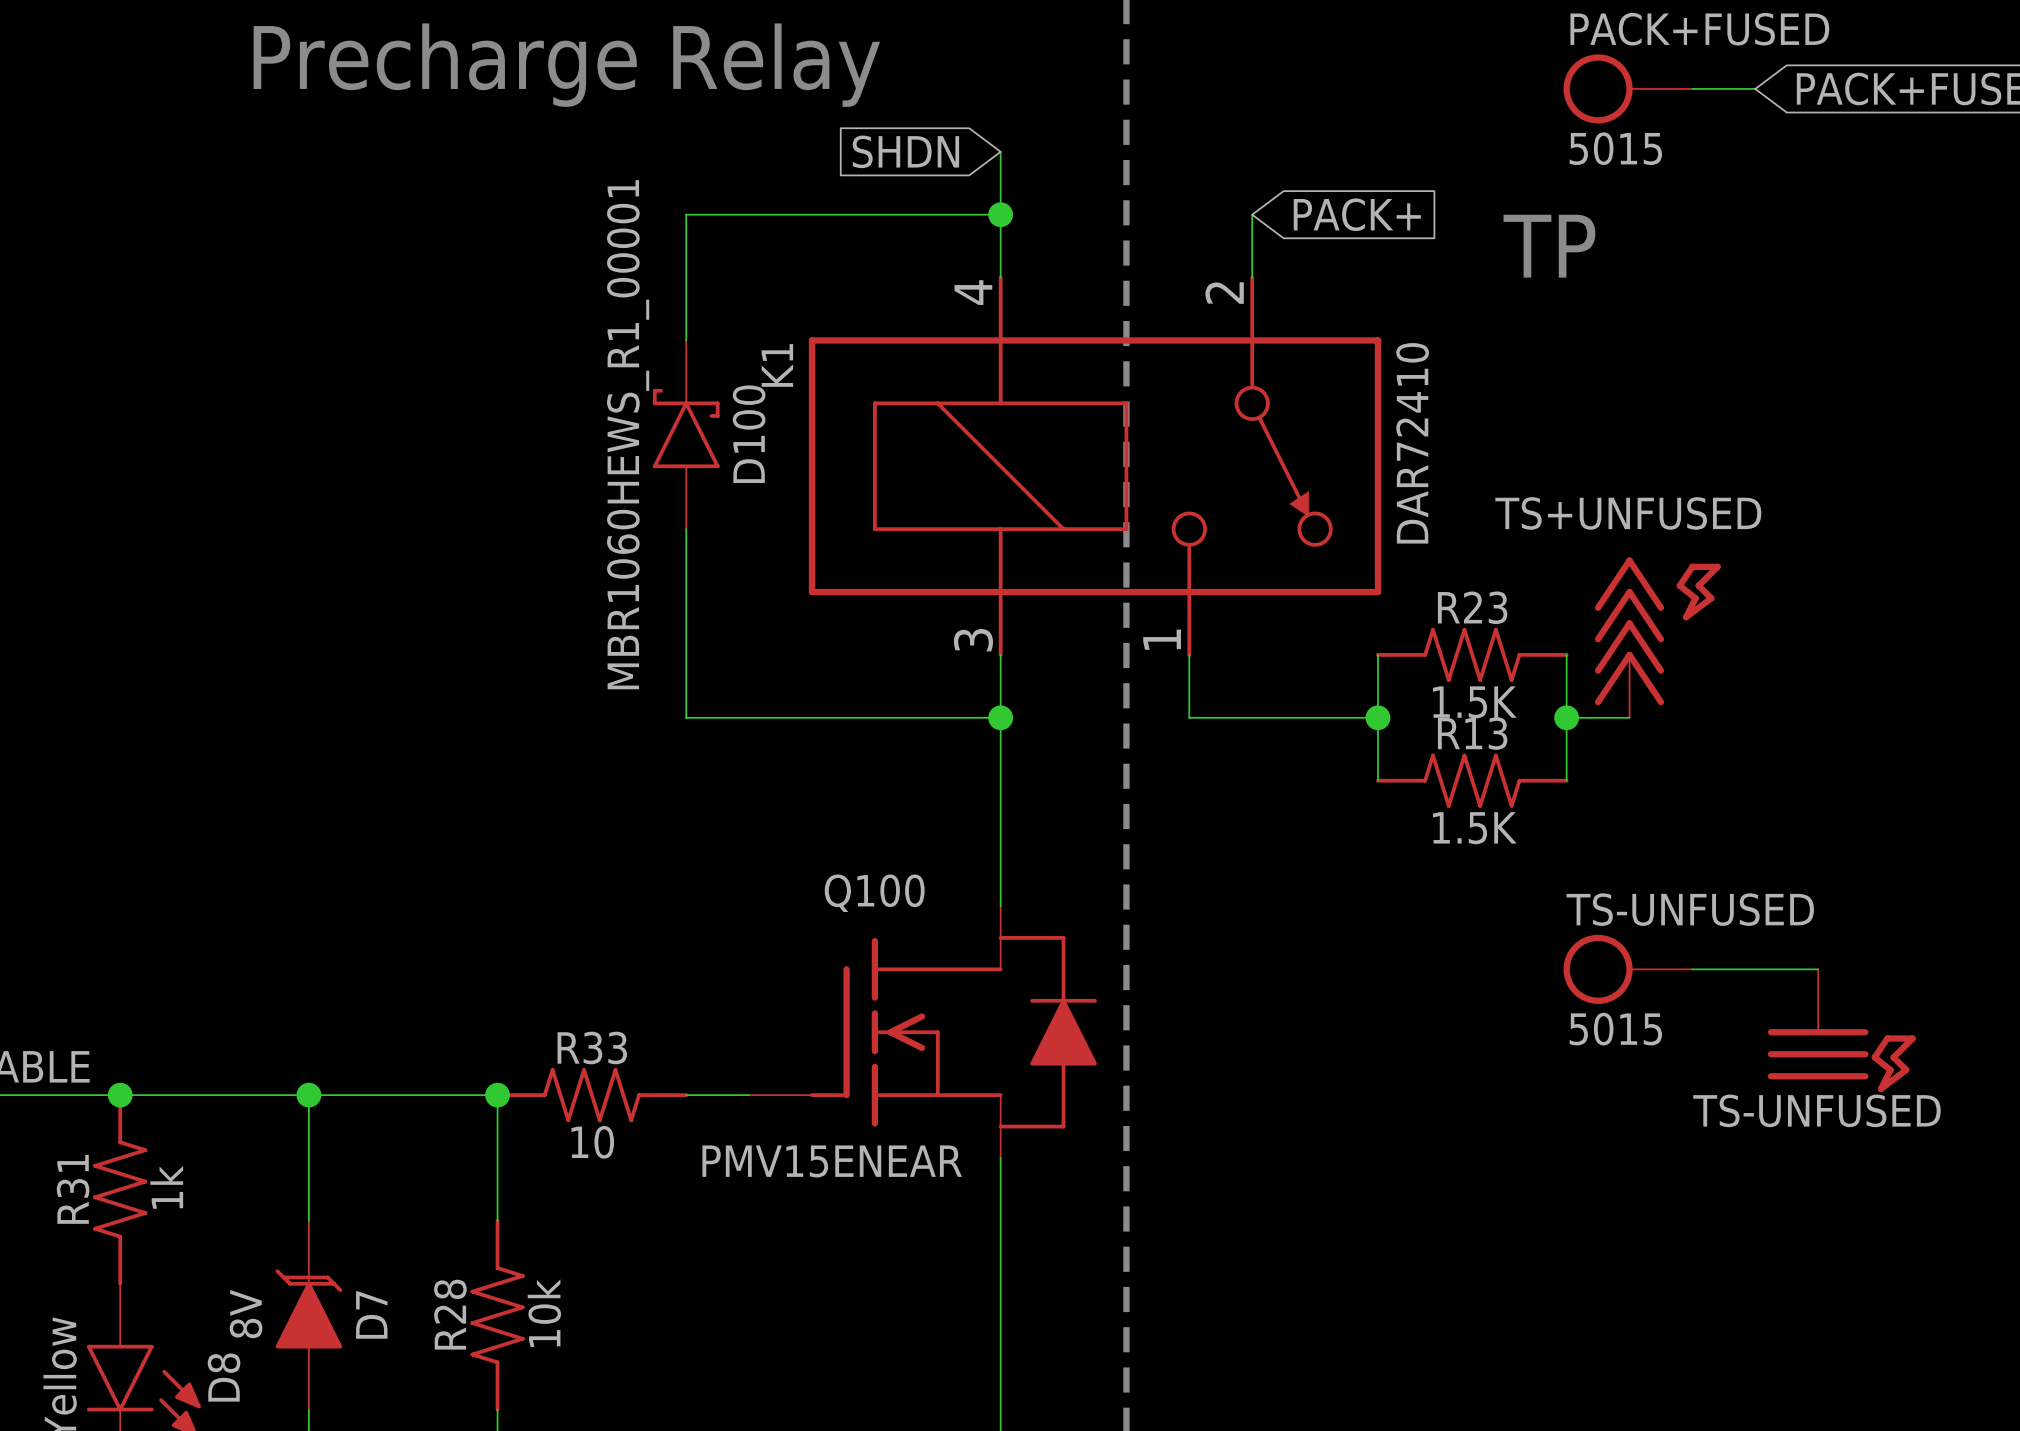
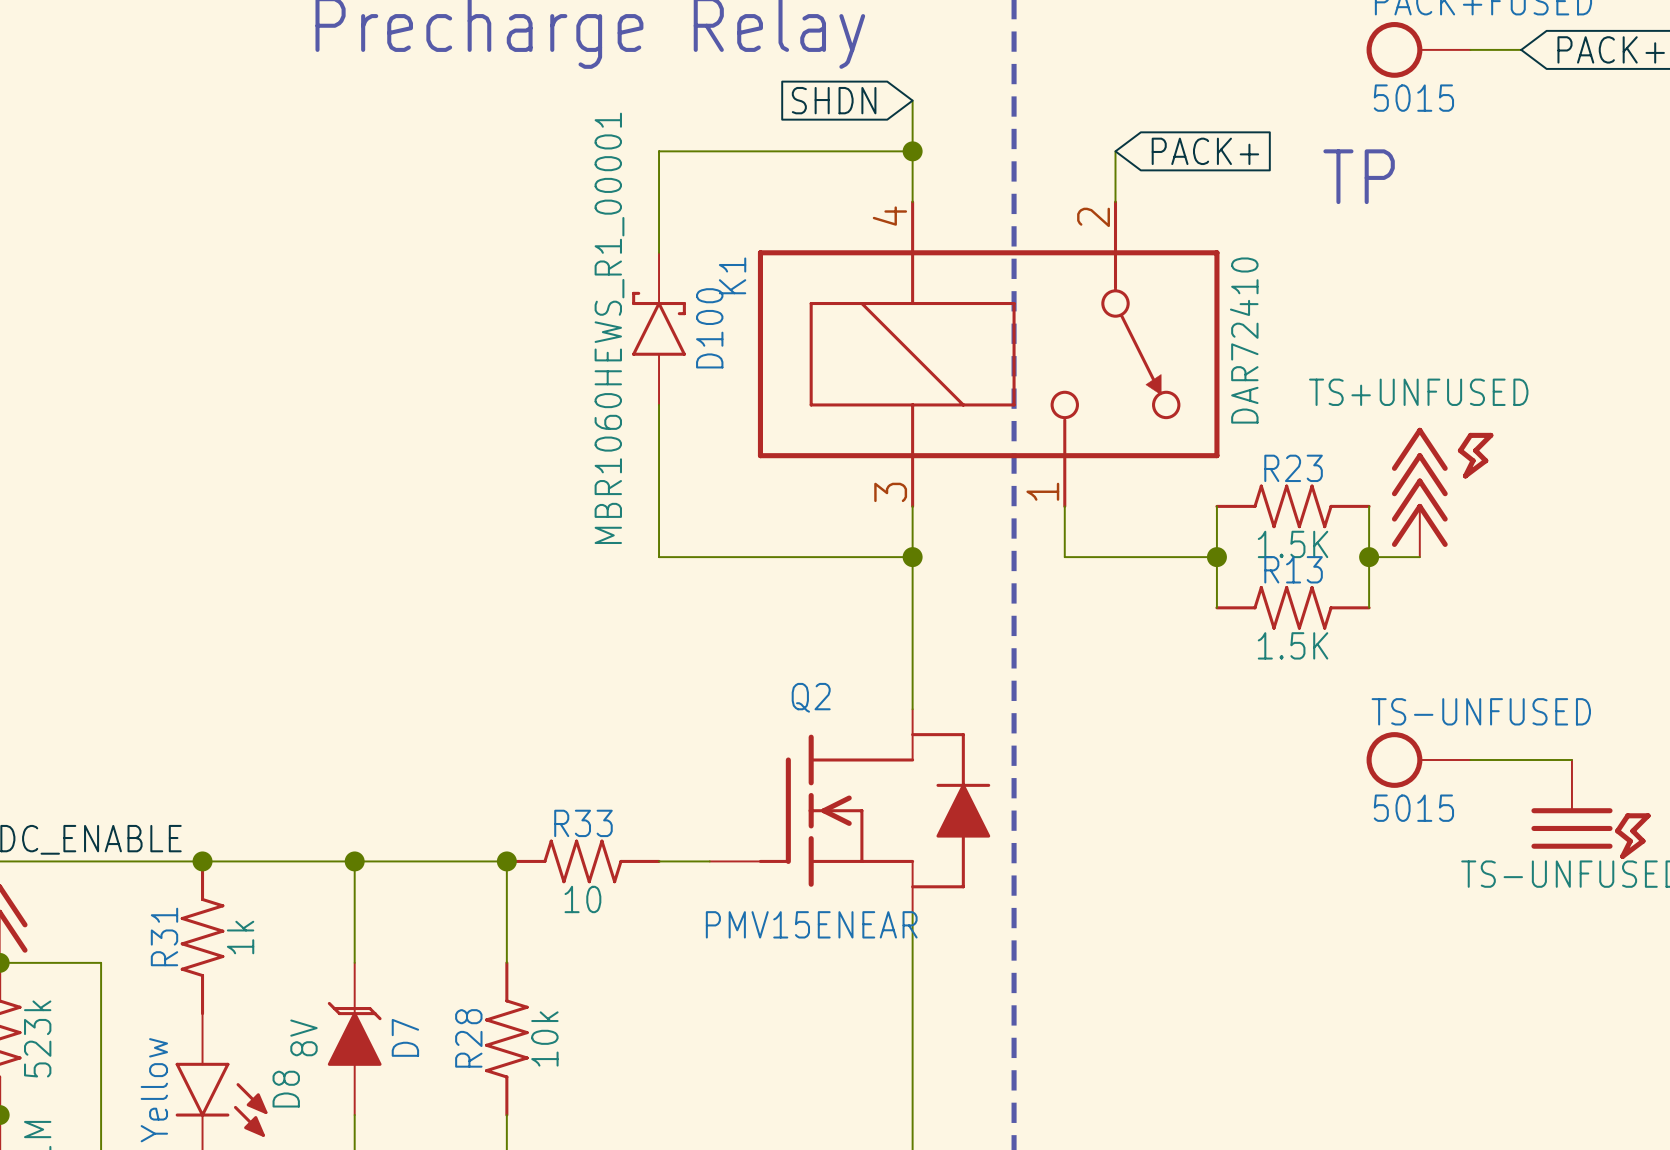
Q100 name: Q100 (874, 893) -> Q2 (811, 697)
Q100 text position: PMV15ENEAR (832, 1161) -> PMV15ENEAR (811, 924)

